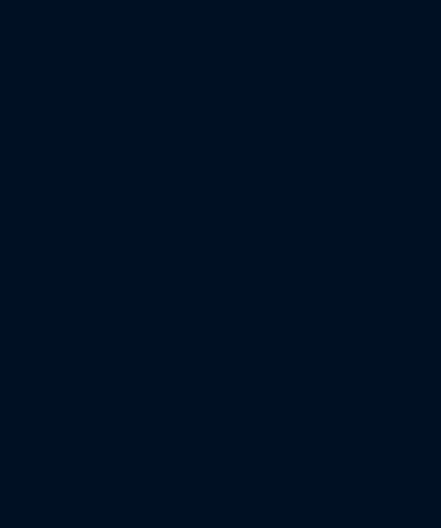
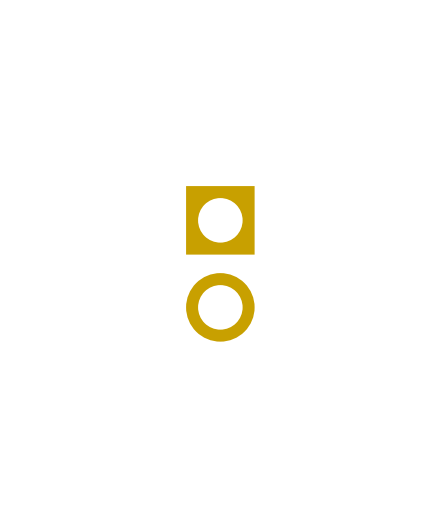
part: none -> (220, 263)

